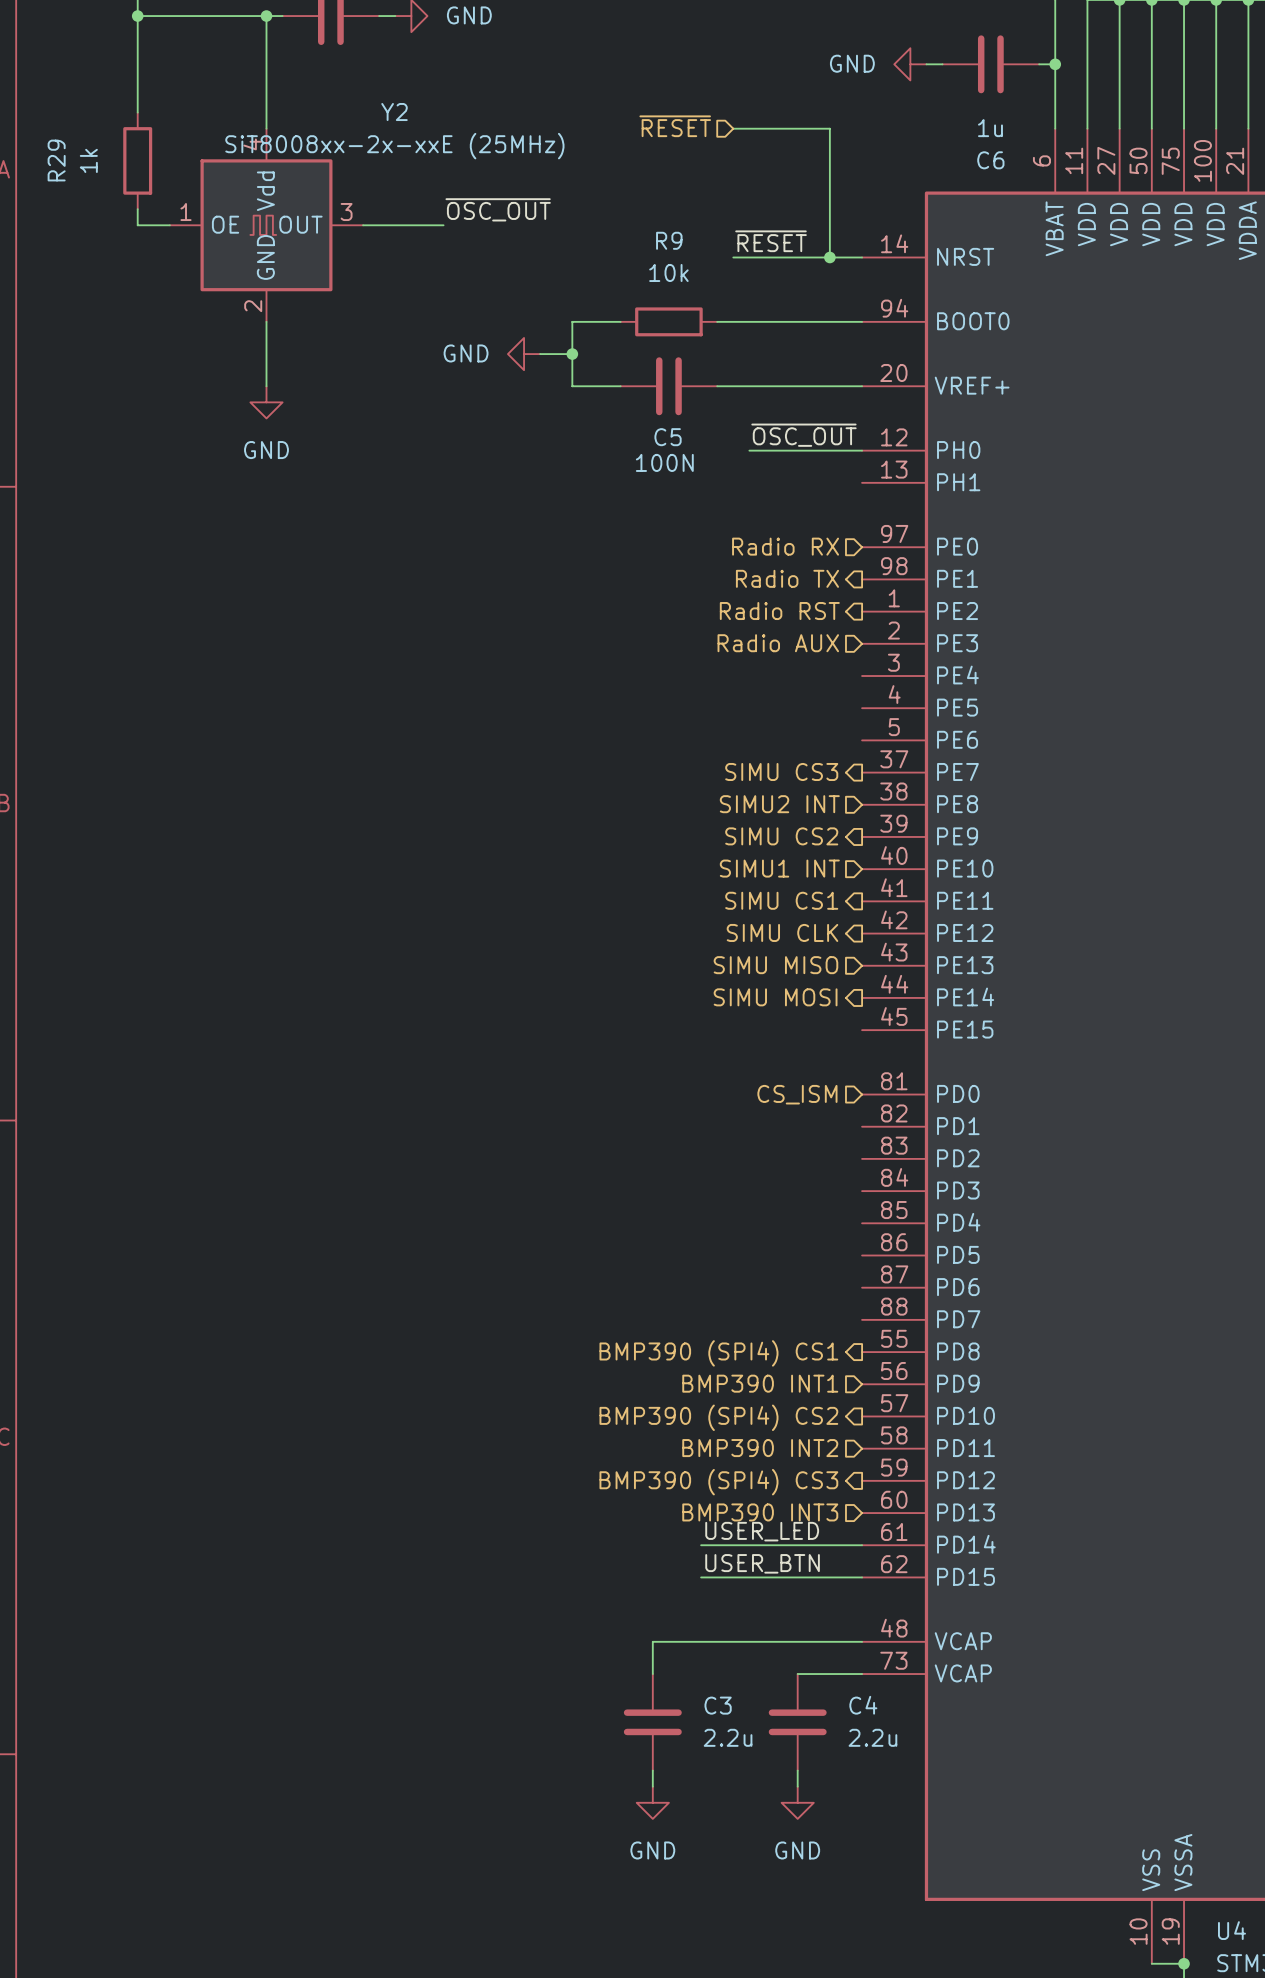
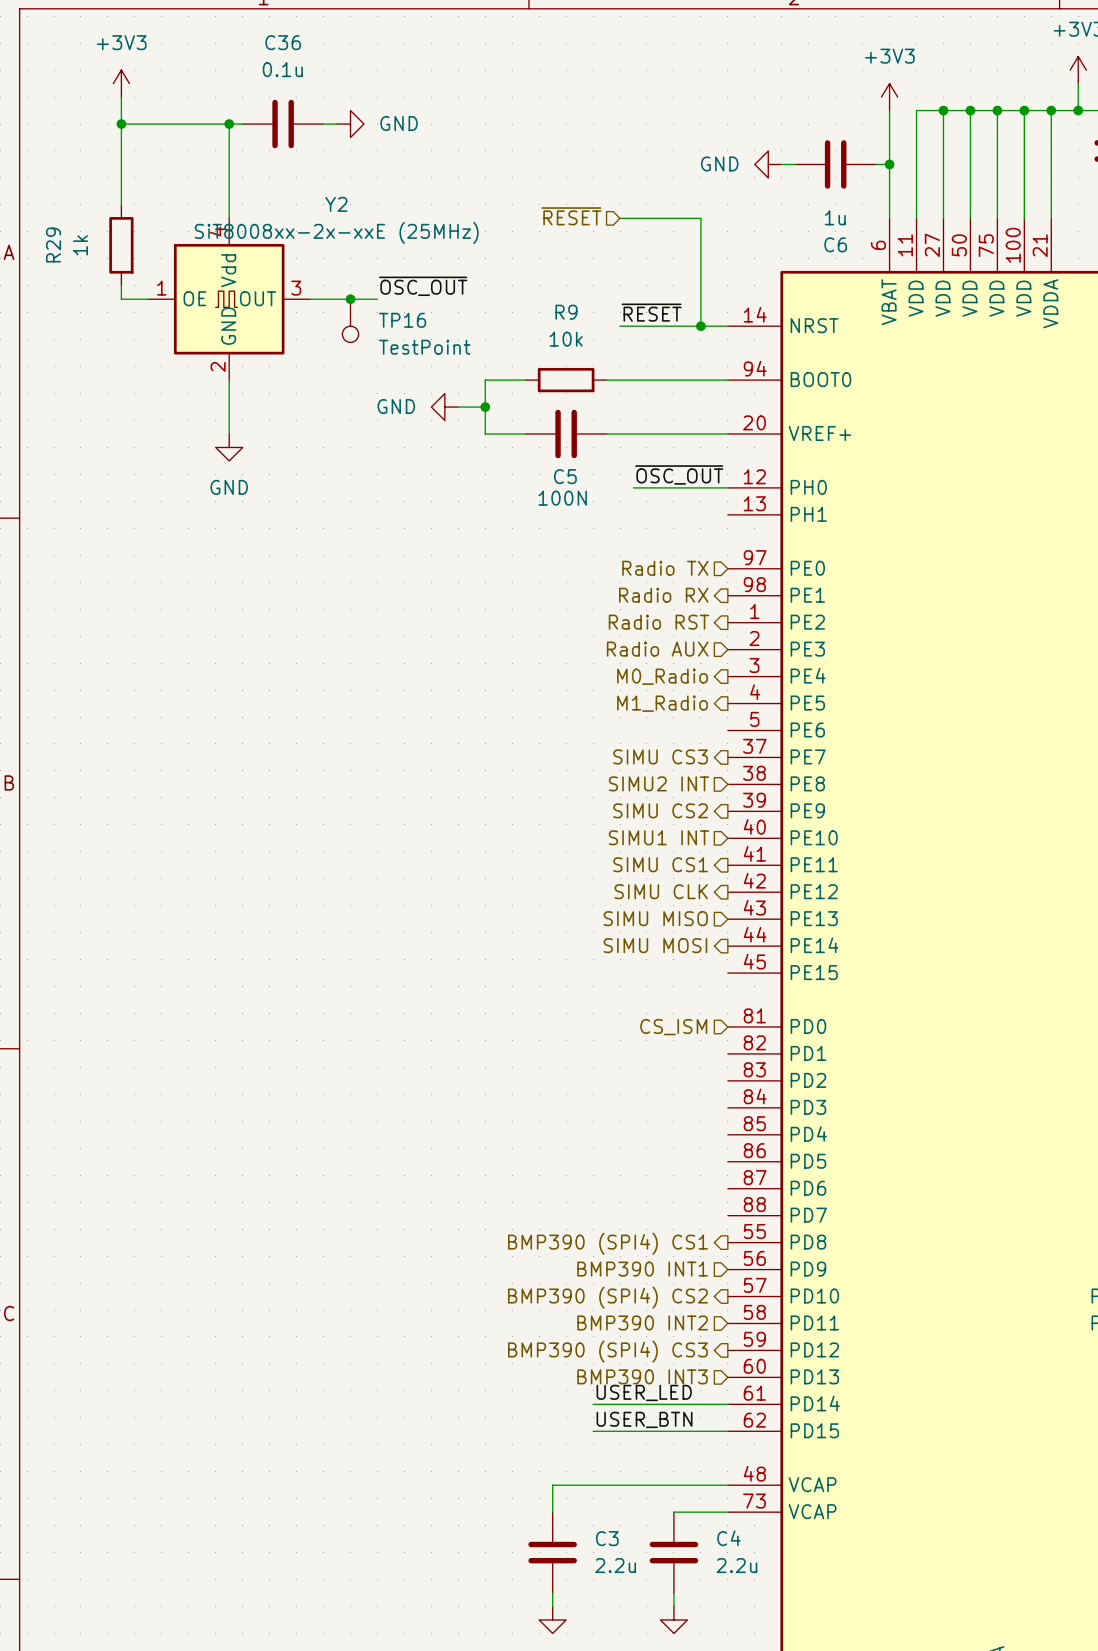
junction: none -> (350, 299)
TP16: none -> TestPoint (350, 320)
hierarchical label: Radio RX (785, 546) -> Radio TX (665, 568)
hierarchical label: Radio TX (787, 578) -> Radio RX (663, 595)
hierarchical label: none -> M0_Radio (662, 676)
hierarchical label: none -> M1_Radio (662, 703)

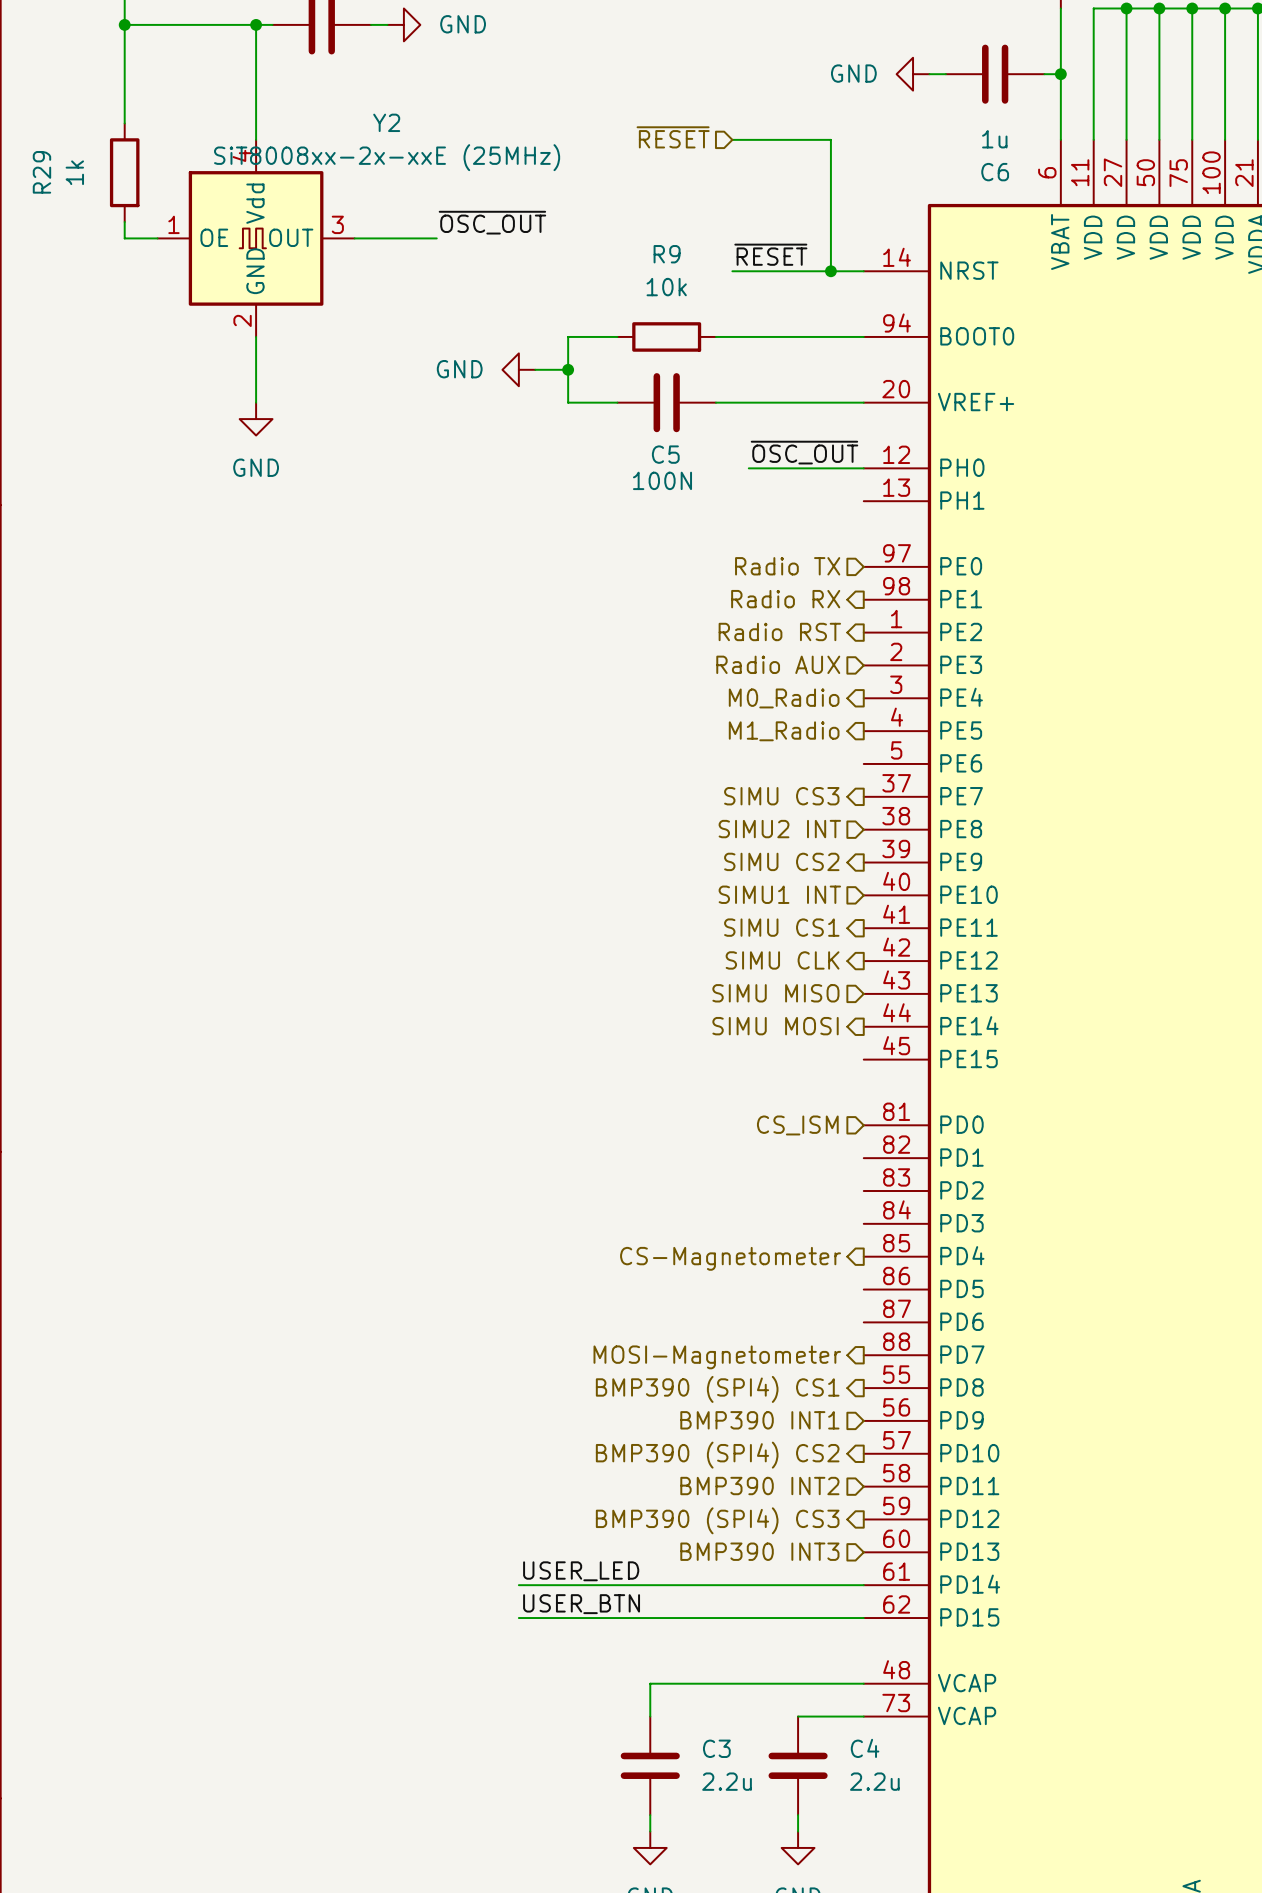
junction: (350, 299) -> none
TP16: TestPoint (350, 320) -> none
hierarchical label: none -> CS-Magnetometer (730, 1258)
hierarchical label: none -> MOSI-Magnetometer (717, 1357)
label position: USER_LED (644, 1392) -> USER_LED (581, 1571)
wire: none -> (518, 1585) (699, 1585)
label position: USER_BTN (644, 1419) -> USER_BTN (581, 1604)
wire: none -> (518, 1618) (699, 1618)

